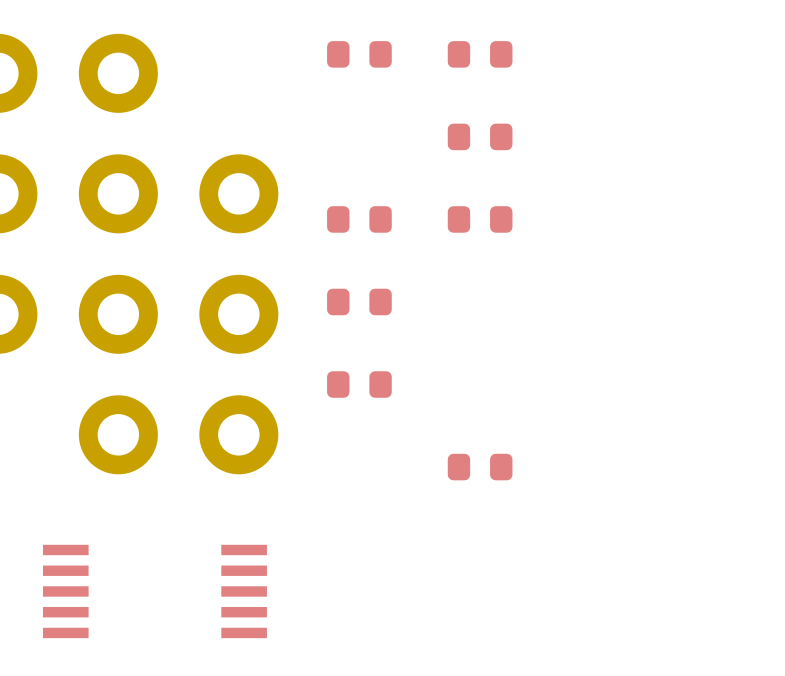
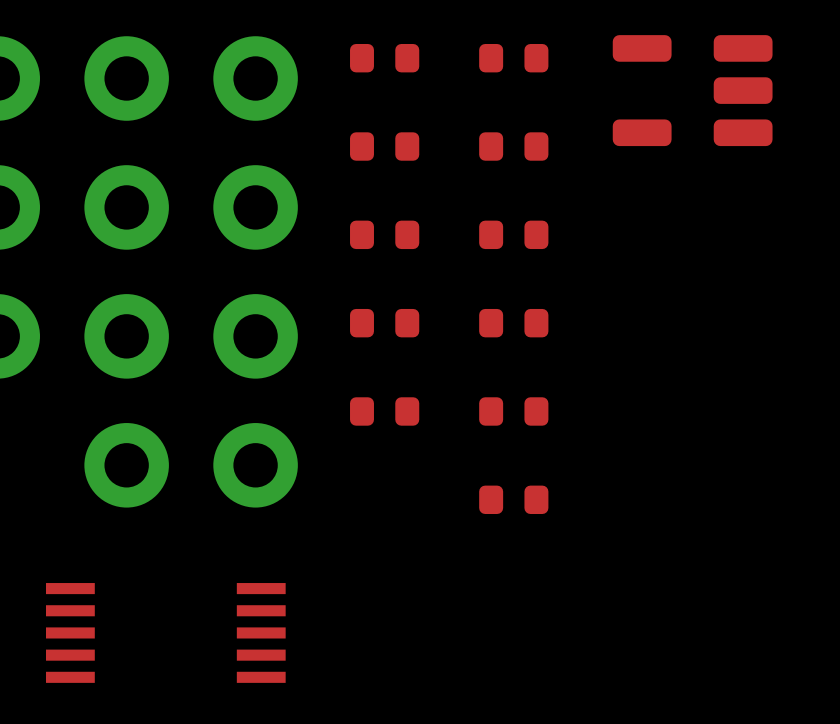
part: none -> (255, 78)
part: none -> (692, 90)
part: none -> (384, 146)
part: none -> (513, 323)
part: none -> (513, 411)

